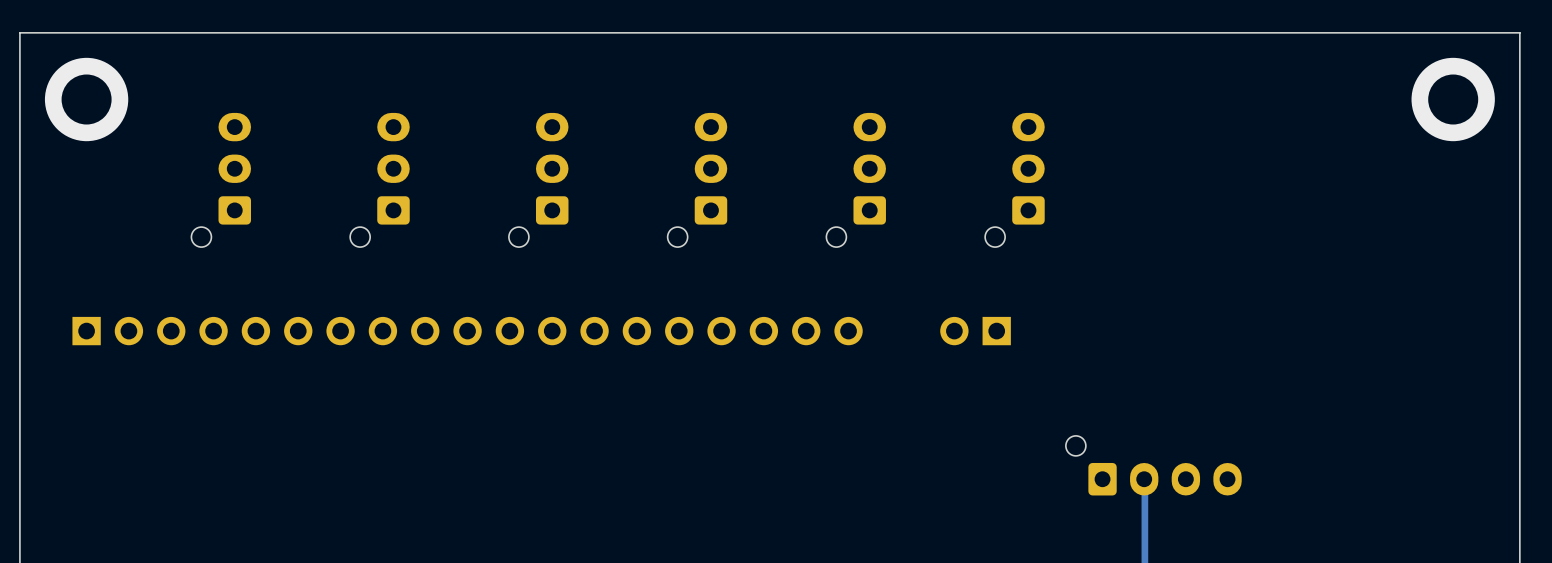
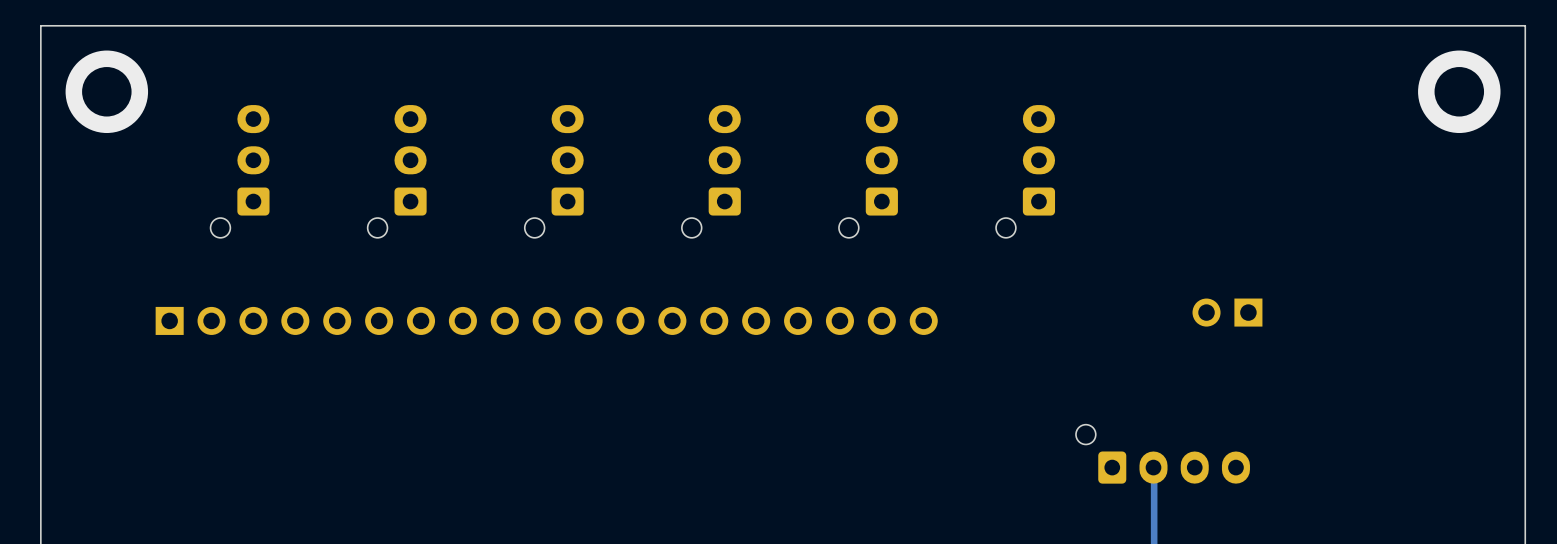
part position: (467, 331) -> (546, 320)
part position: (975, 331) -> (1227, 312)

